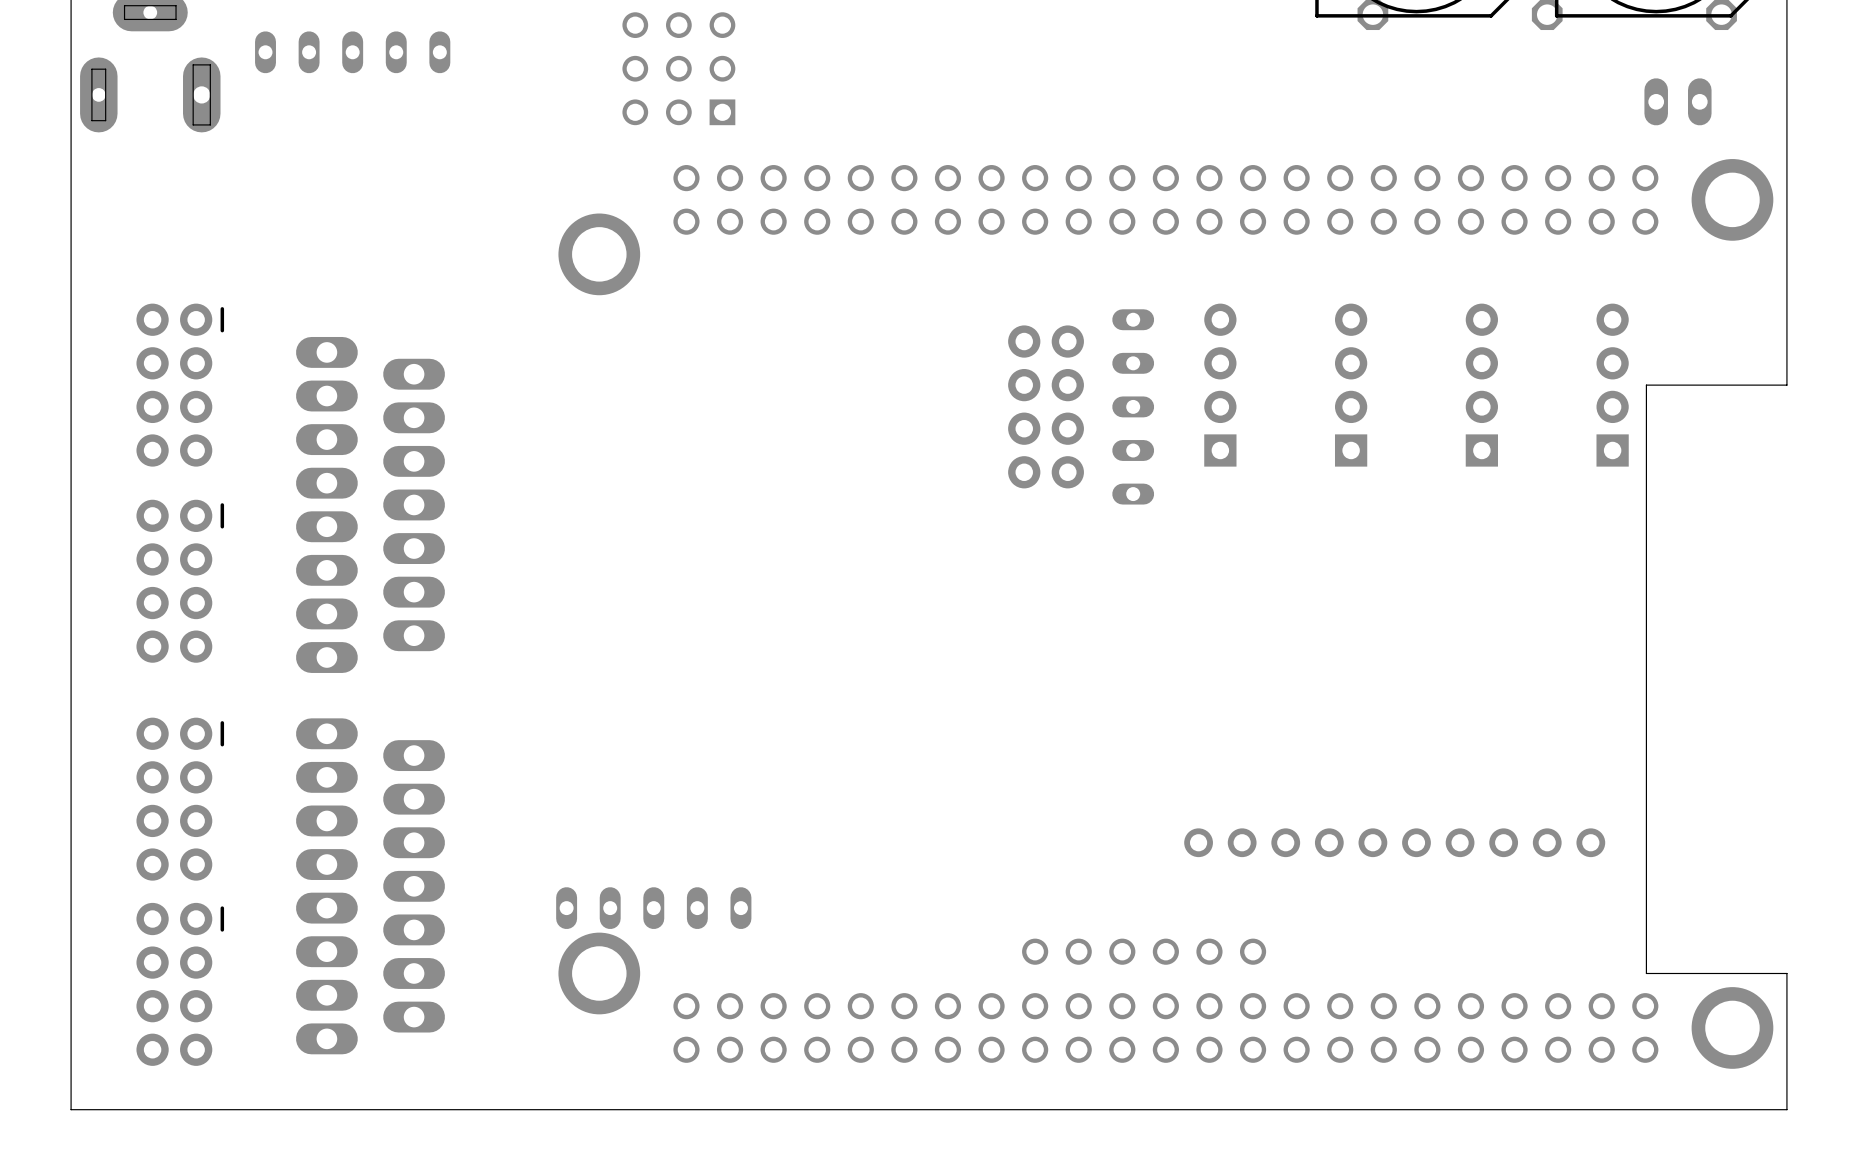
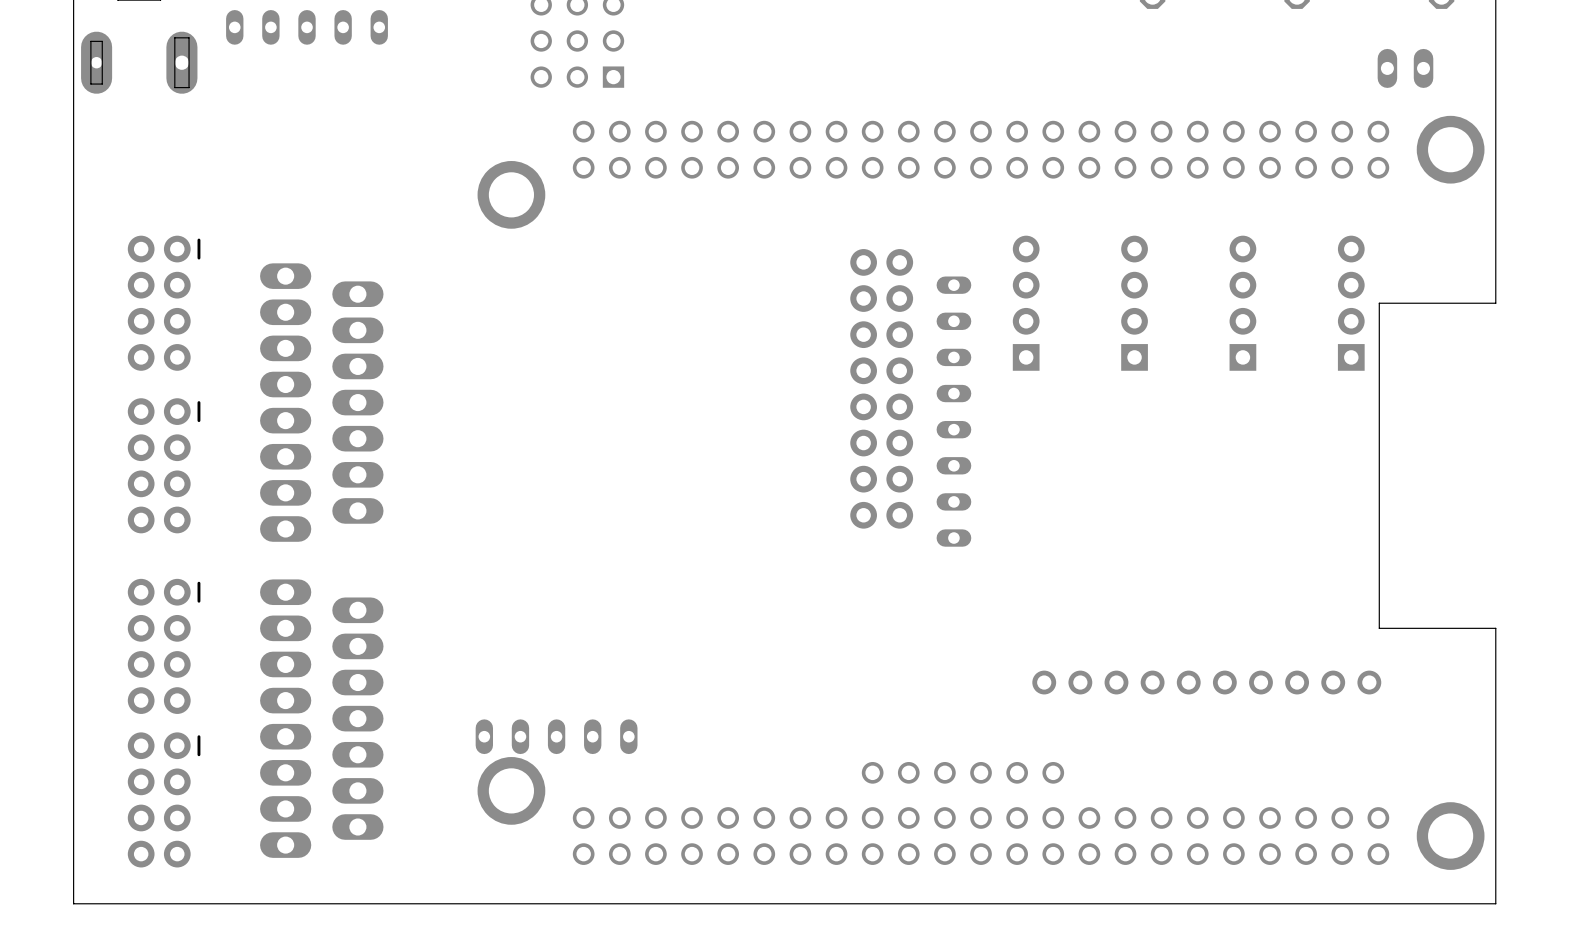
part: (1024, 406) -> none
part: (1067, 406) -> none
part: (1133, 406) -> none
part: none -> (863, 388)
part: none -> (899, 388)
part: none -> (953, 411)
board edge: (1646, 777) (1646, 973) (1786, 973) -> (1379, 628) (1495, 628) (1495, 790)
part position: (1394, 842) -> (1206, 682)

